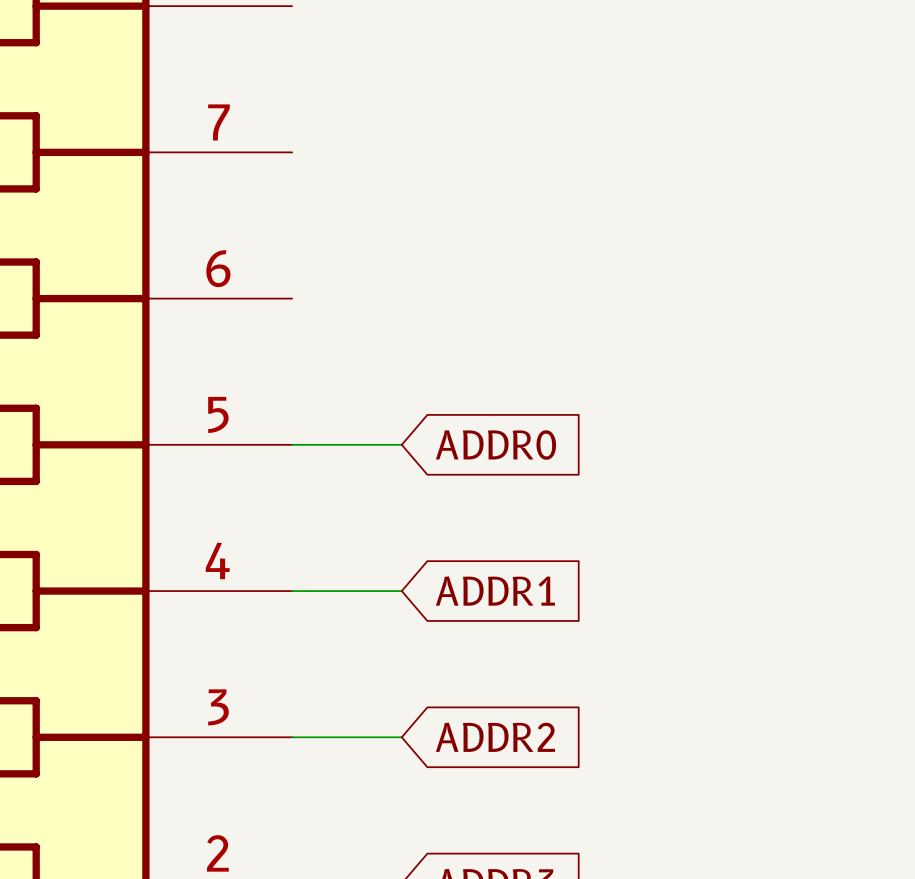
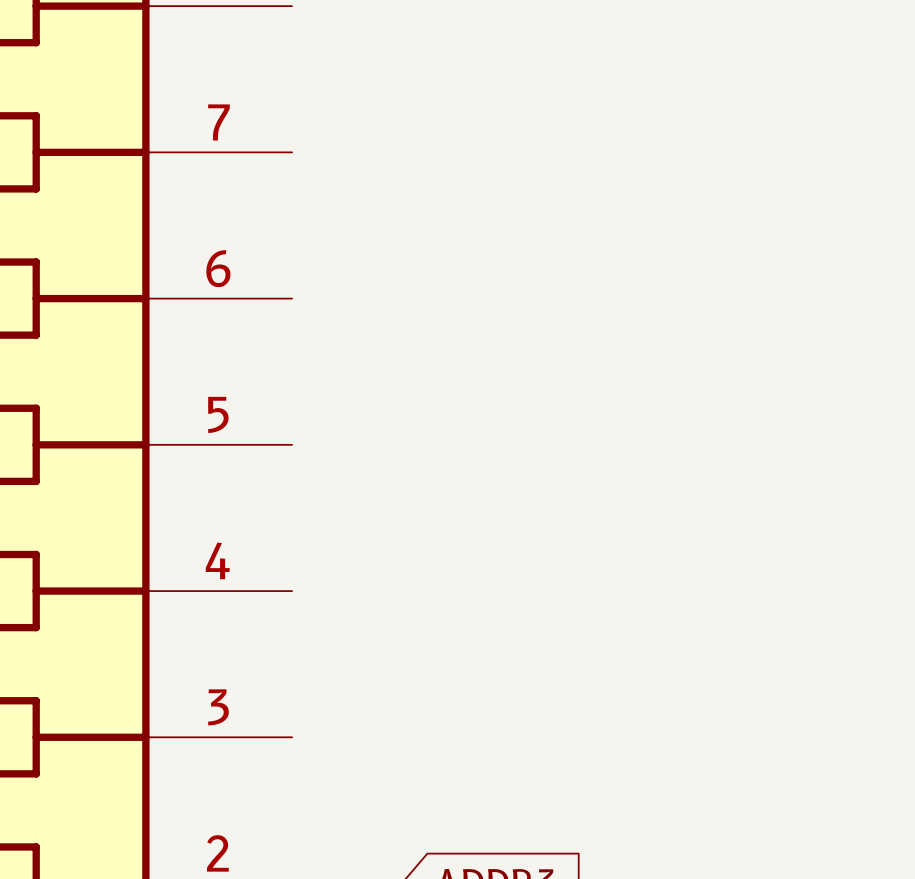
wire: (292, 444) (401, 444) -> none
global label: ADDR0 (495, 444) -> none
wire: (292, 591) (401, 591) -> none
global label: ADDR1 (495, 591) -> none
wire: (292, 737) (401, 737) -> none
global label: ADDR2 (495, 737) -> none

